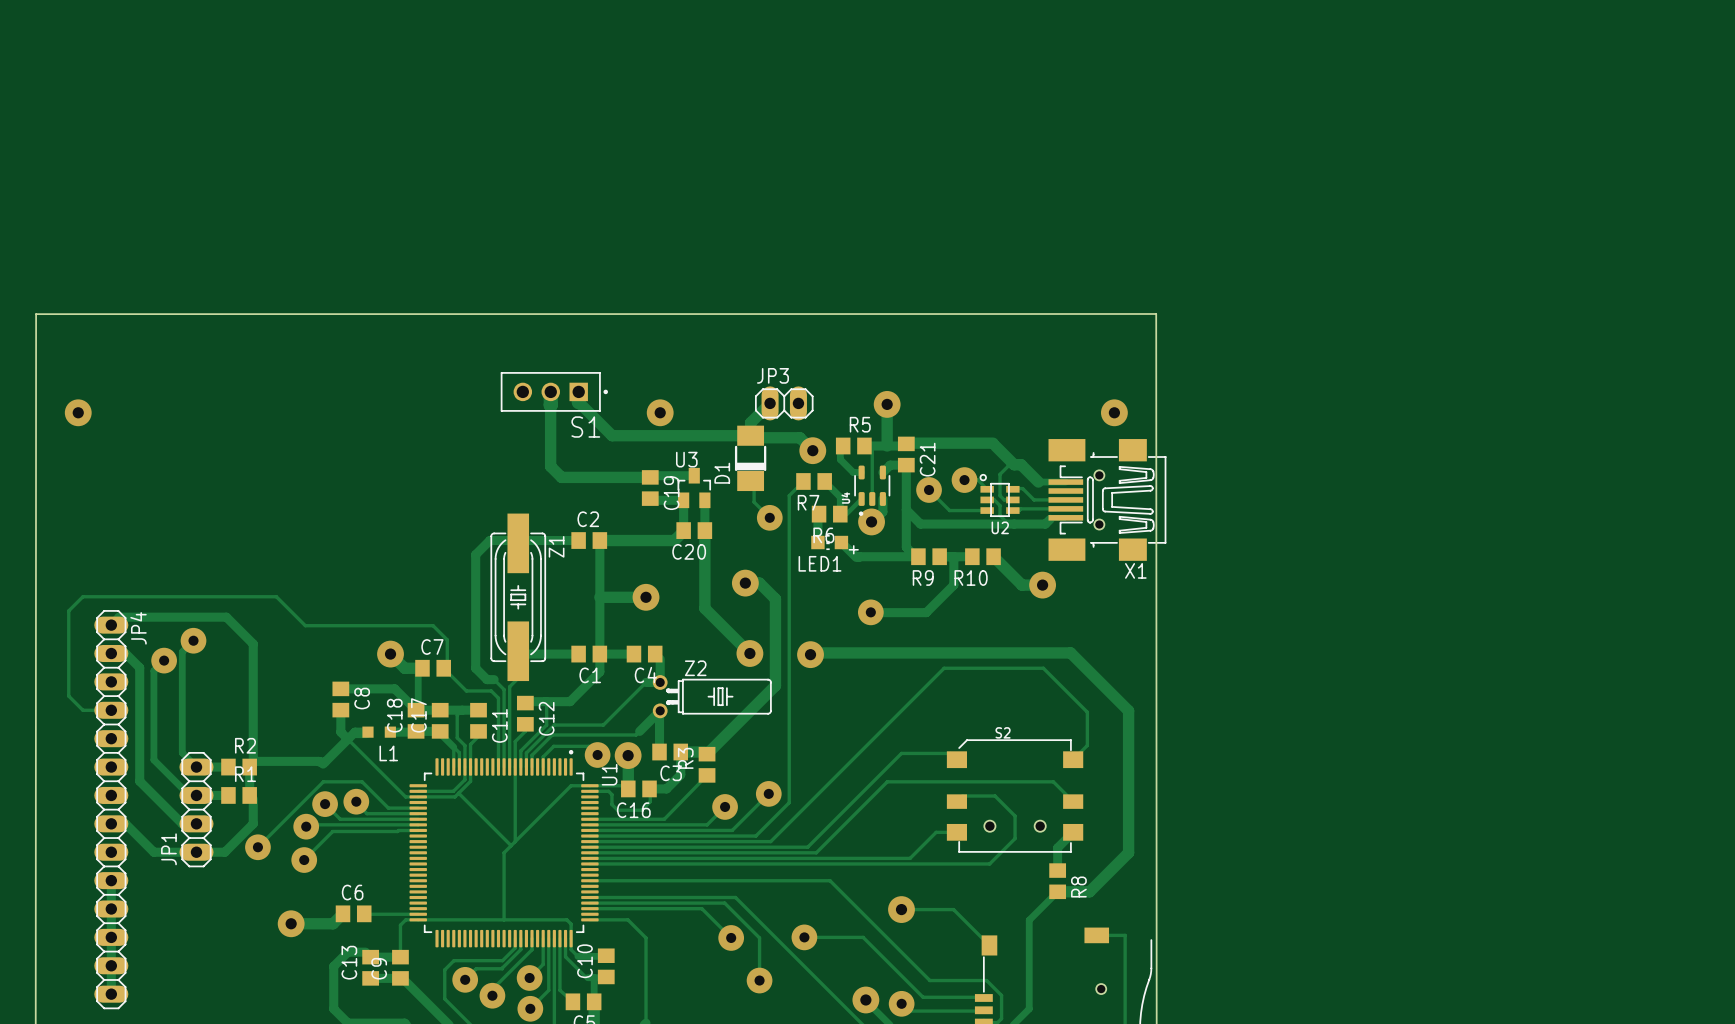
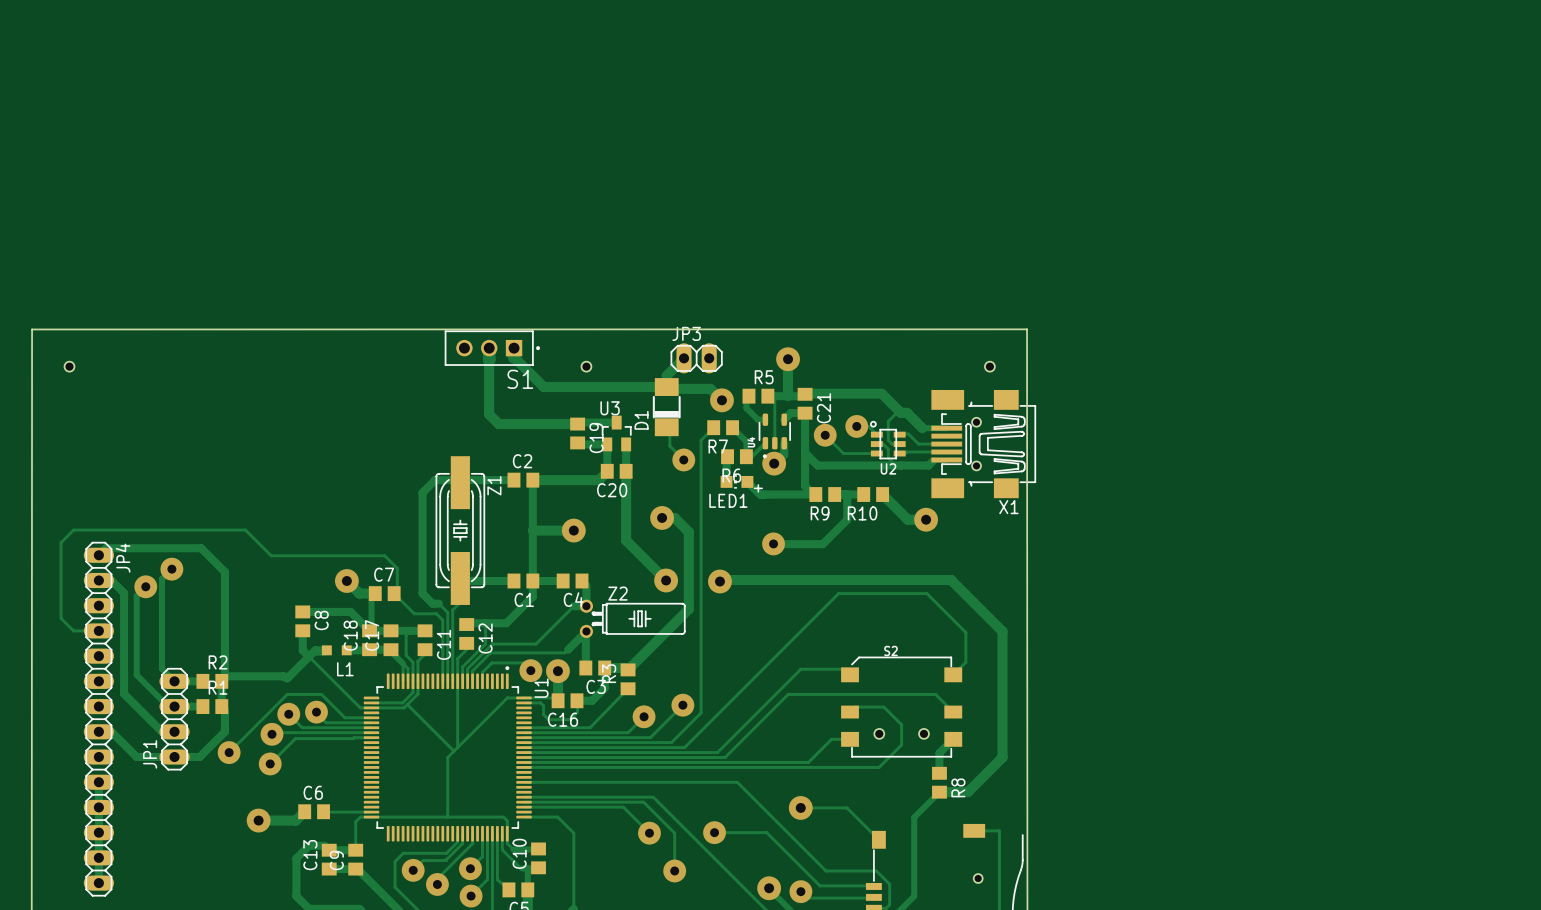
board edge: (1156, 370) (1156, 313) (36, 314) (36, 370) -> (1027, 329) (32, 329)
via: (78, 412) -> none
hole: none -> (69, 366)
via: (660, 412) -> none
hole: none -> (586, 366)
via: (1114, 412) -> none
hole: none -> (989, 366)

